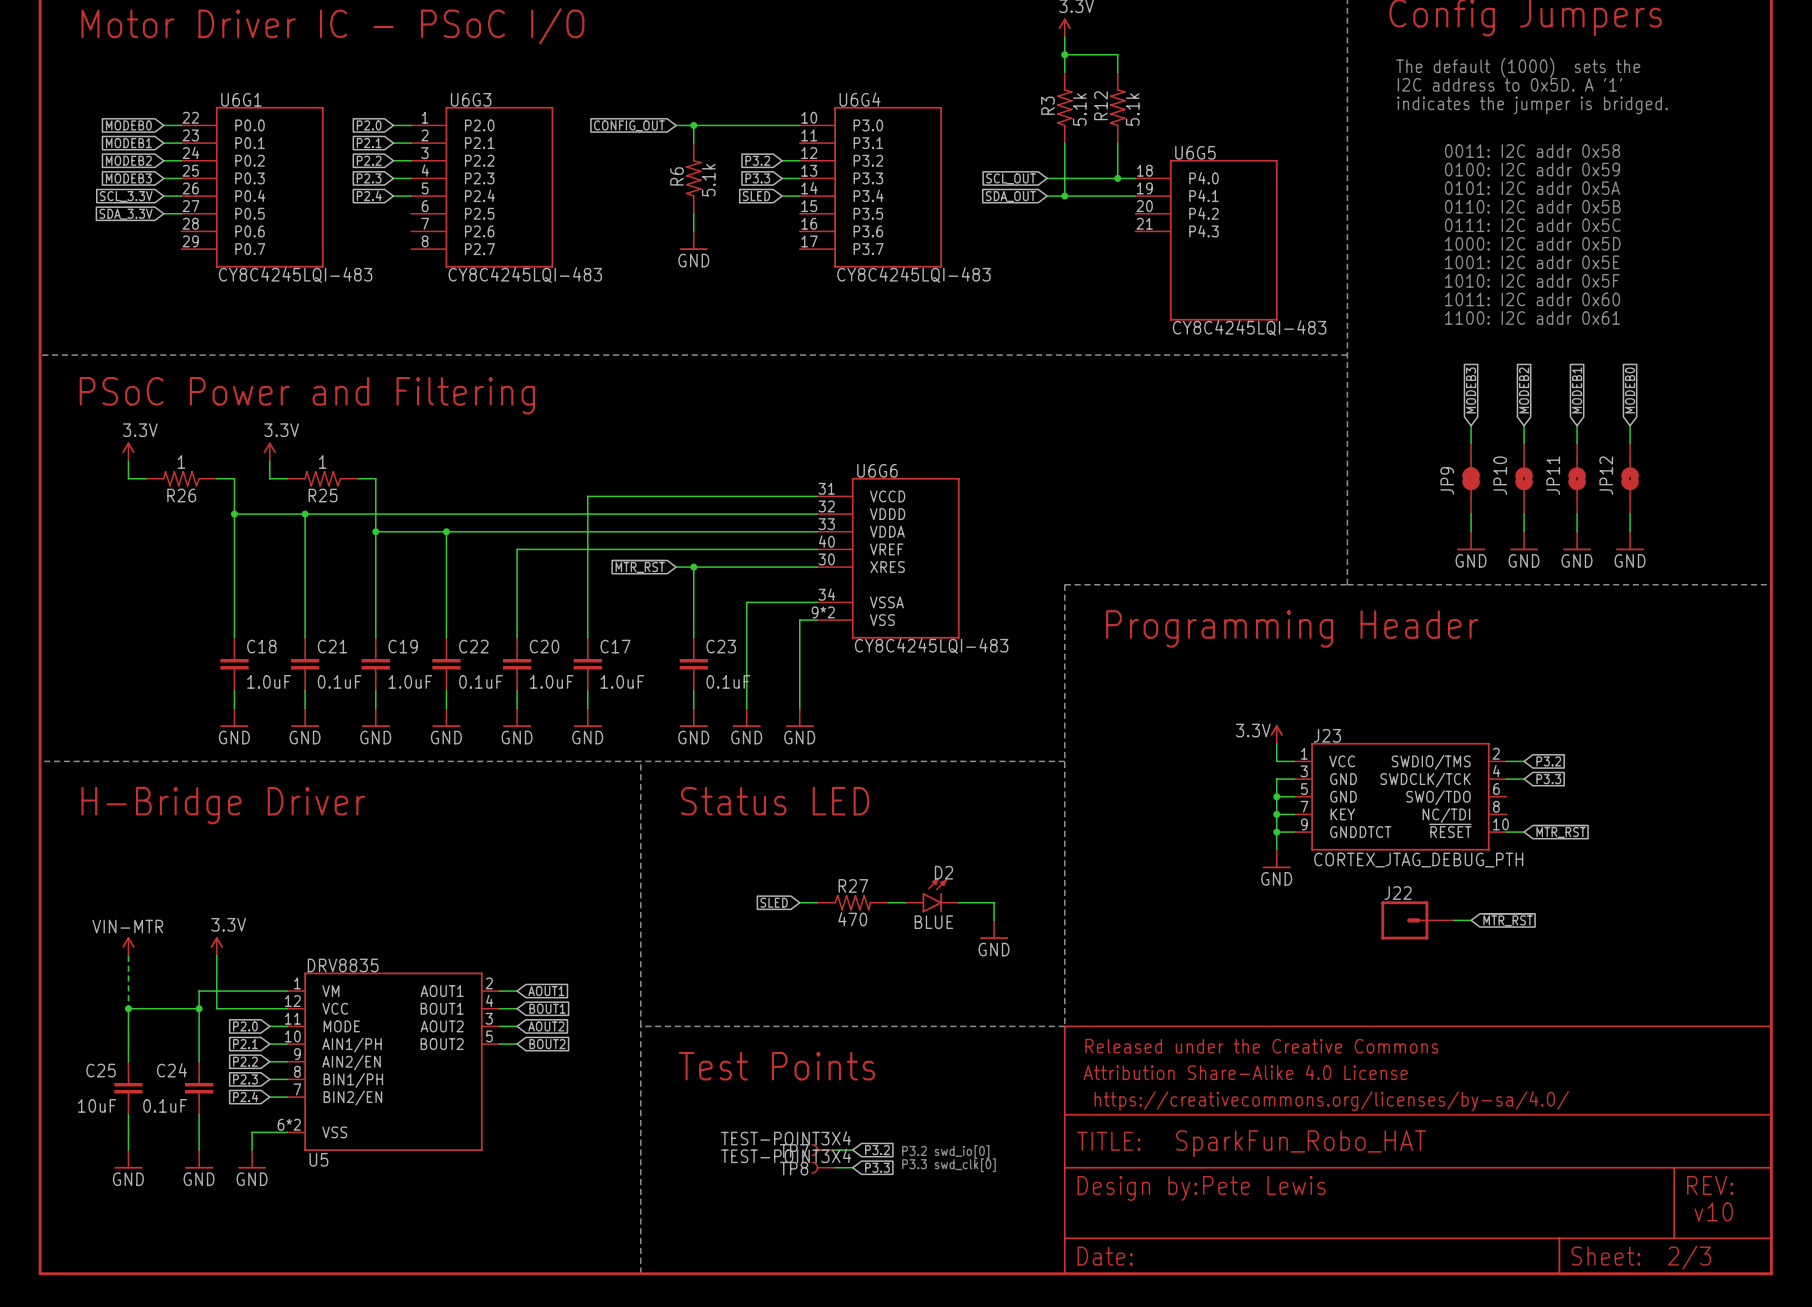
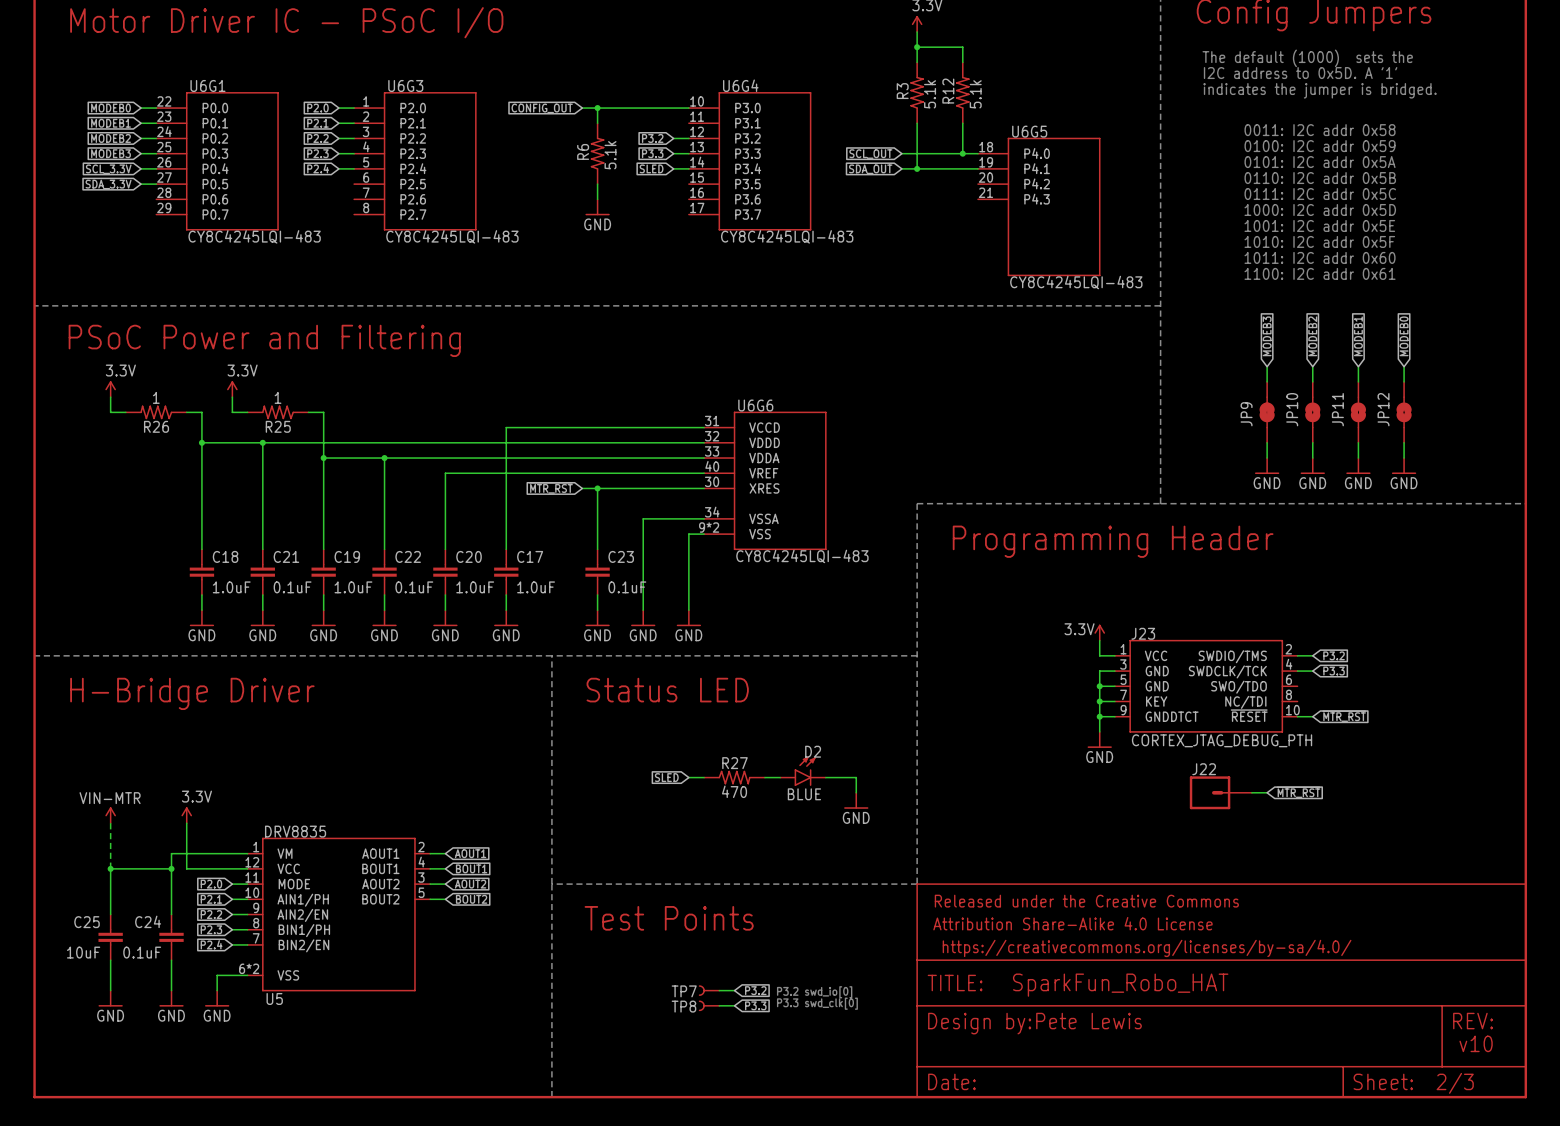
TP7 value: TEST-POINT3X4 (786, 1138) -> none
TP8 value: TEST-POINT3X4 (786, 1155) -> none

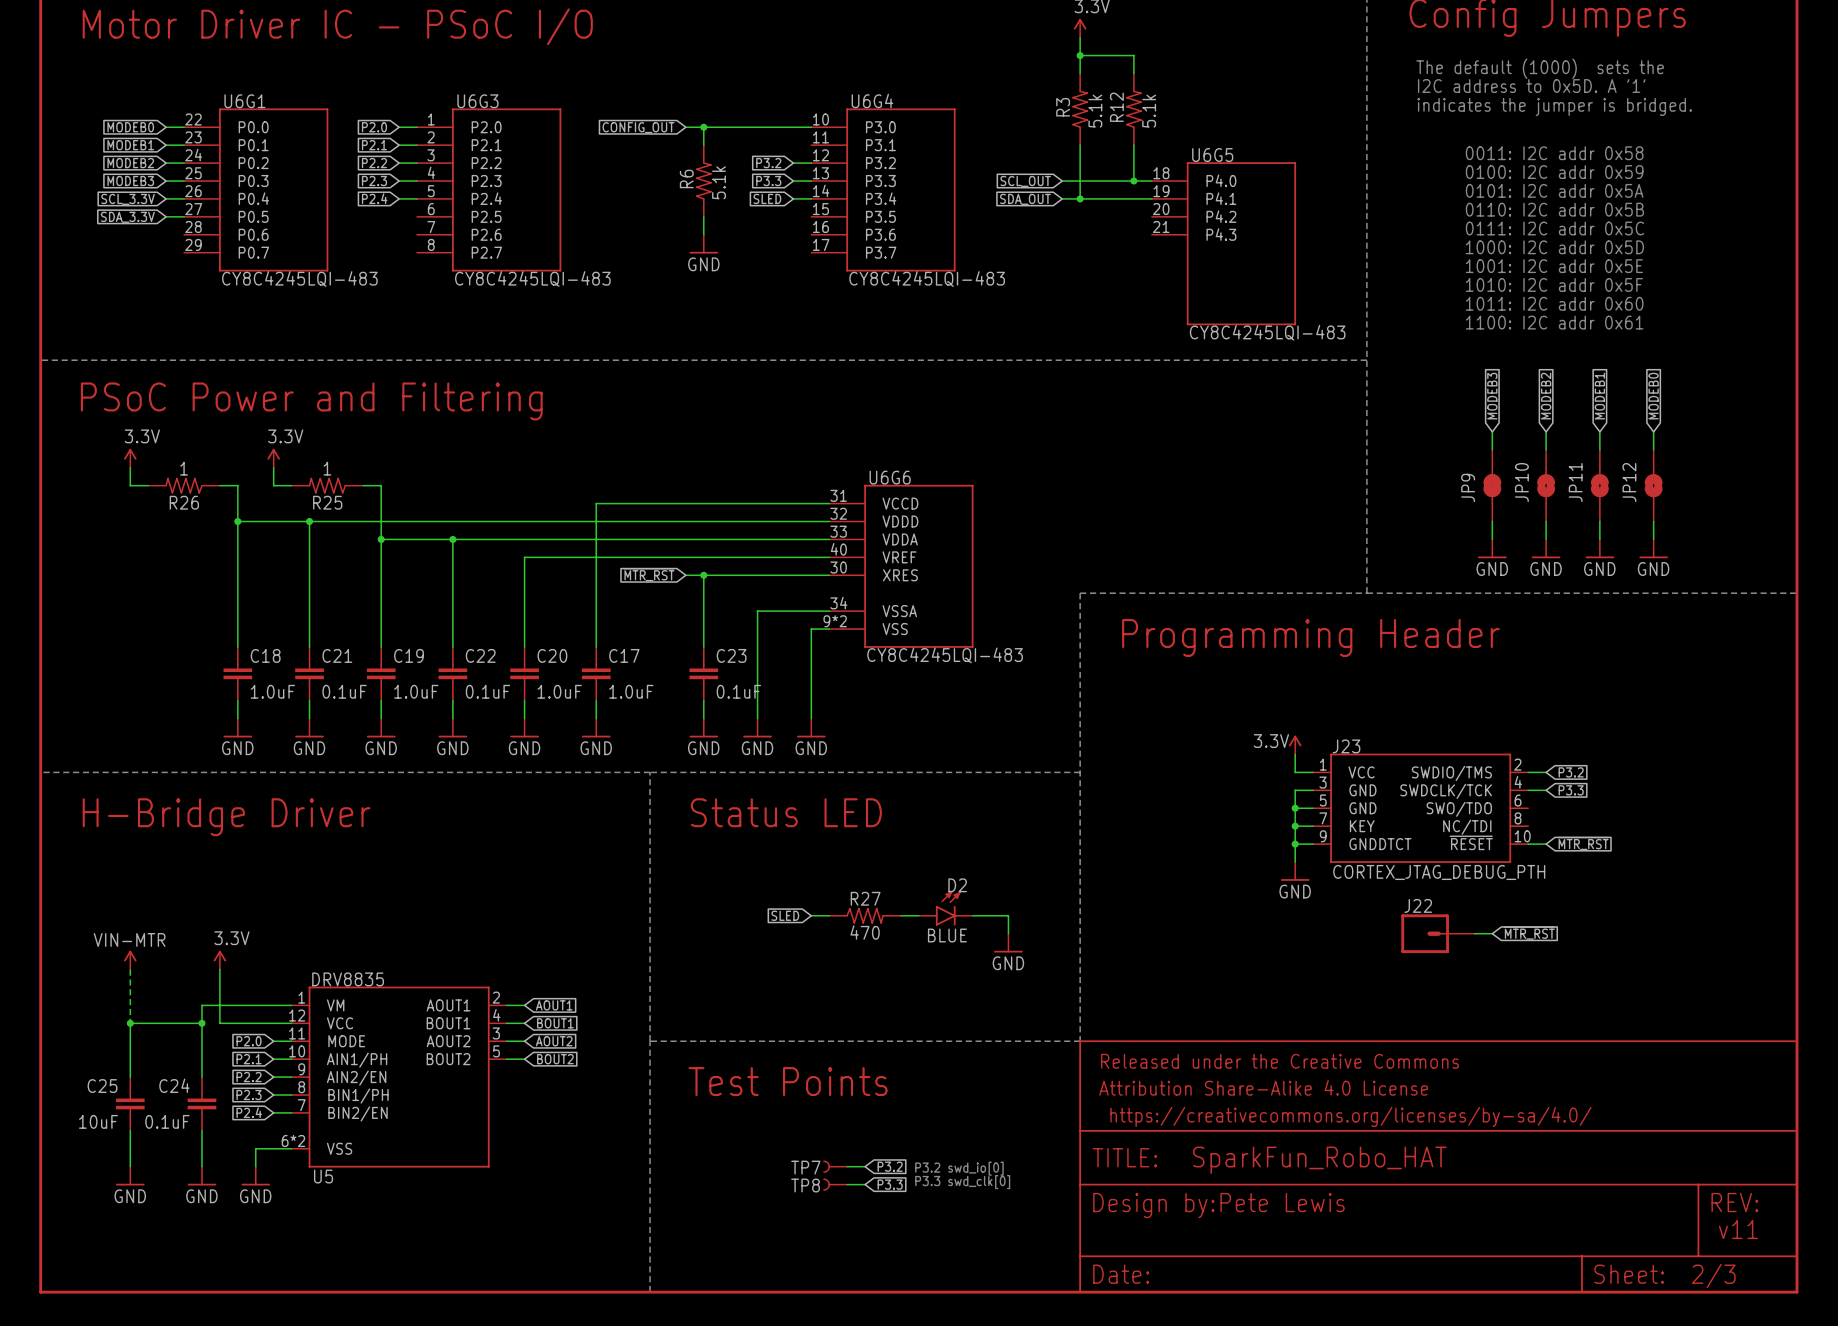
text: v10 (1476, 1043) -> v11 (1738, 1229)

